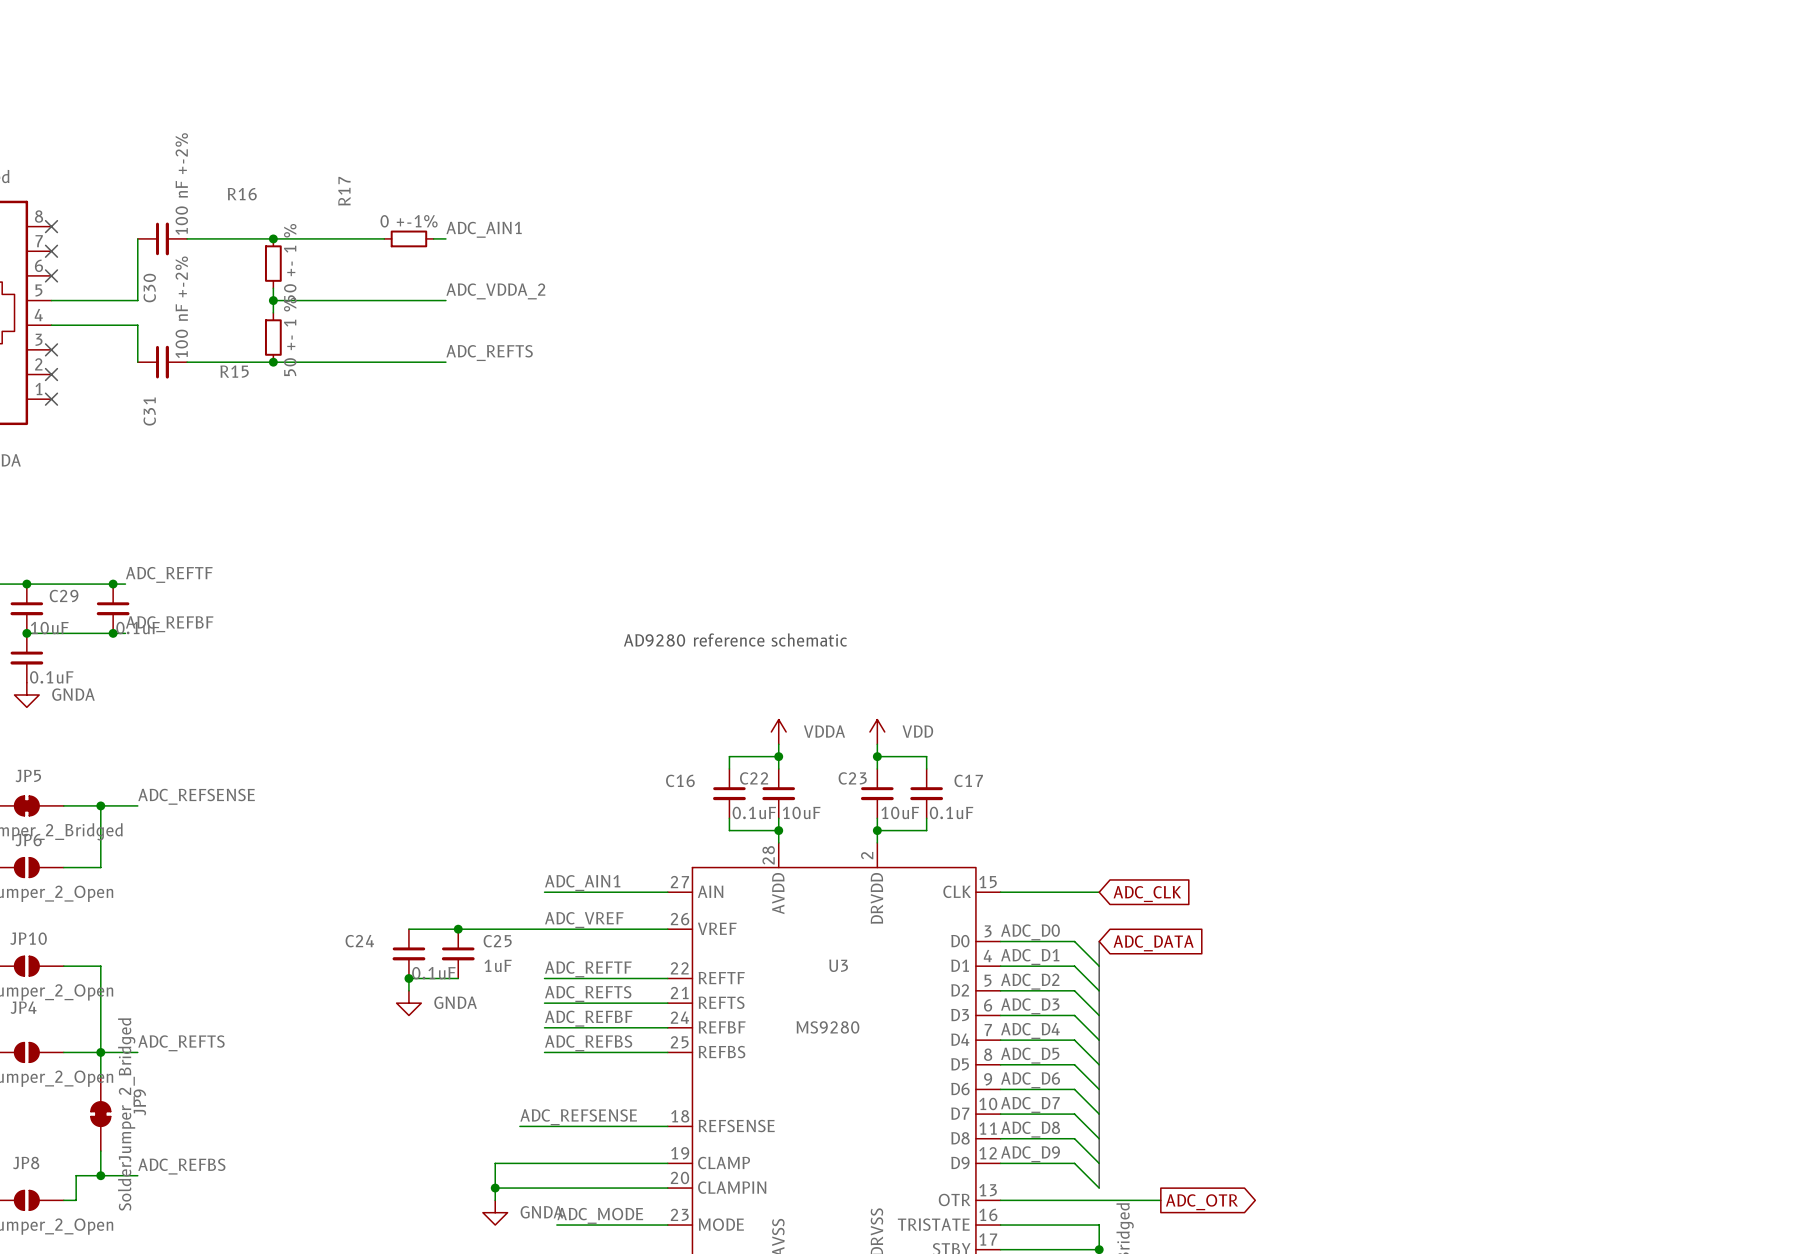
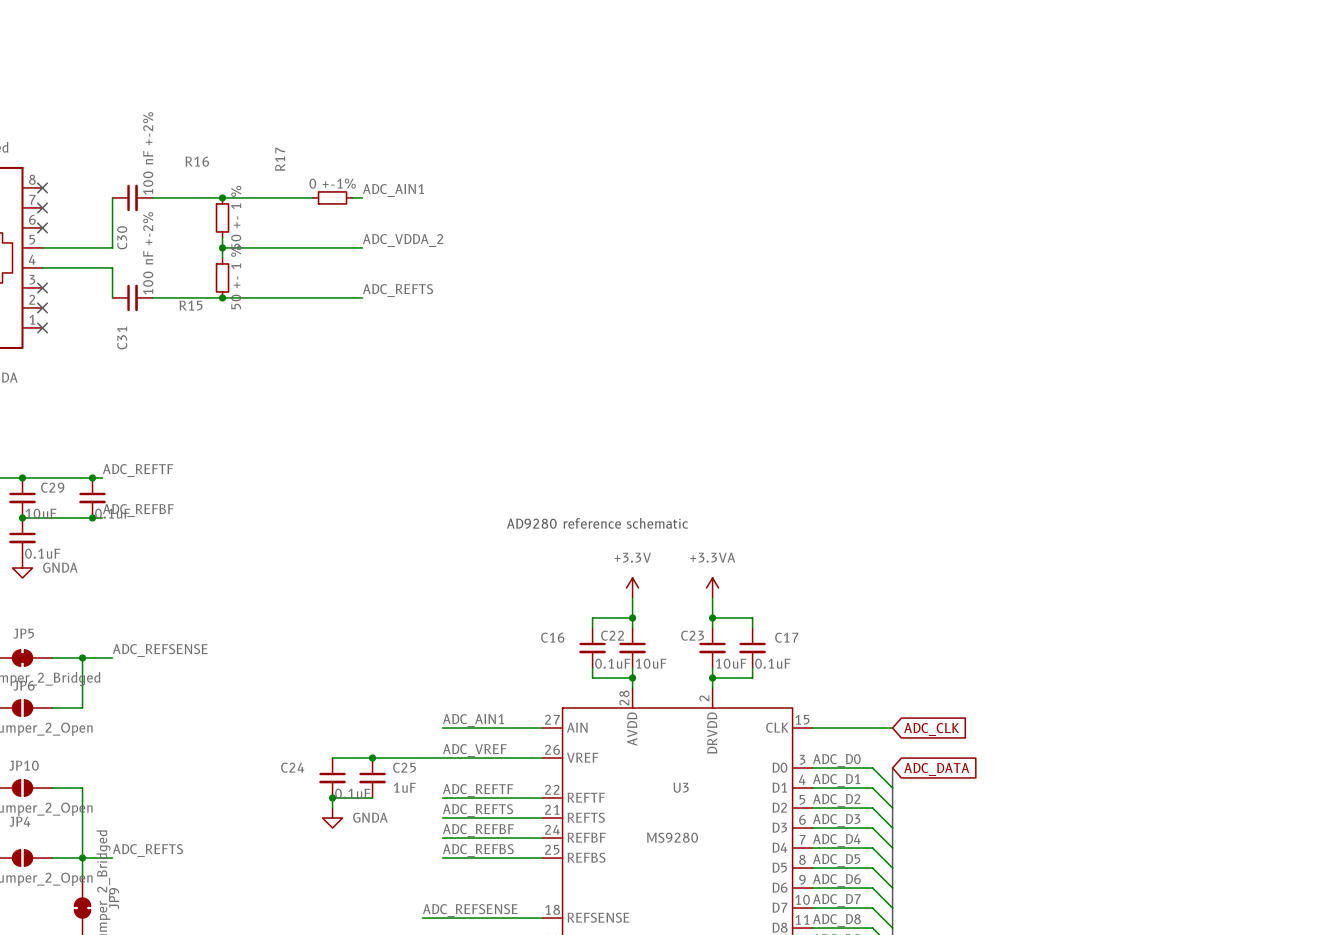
power symbol: none -> +3.3V (632, 587)
power symbol: none -> +3.3VA (712, 587)
power symbol: VDDA (778, 731) -> none
power symbol: VDD (877, 731) -> none

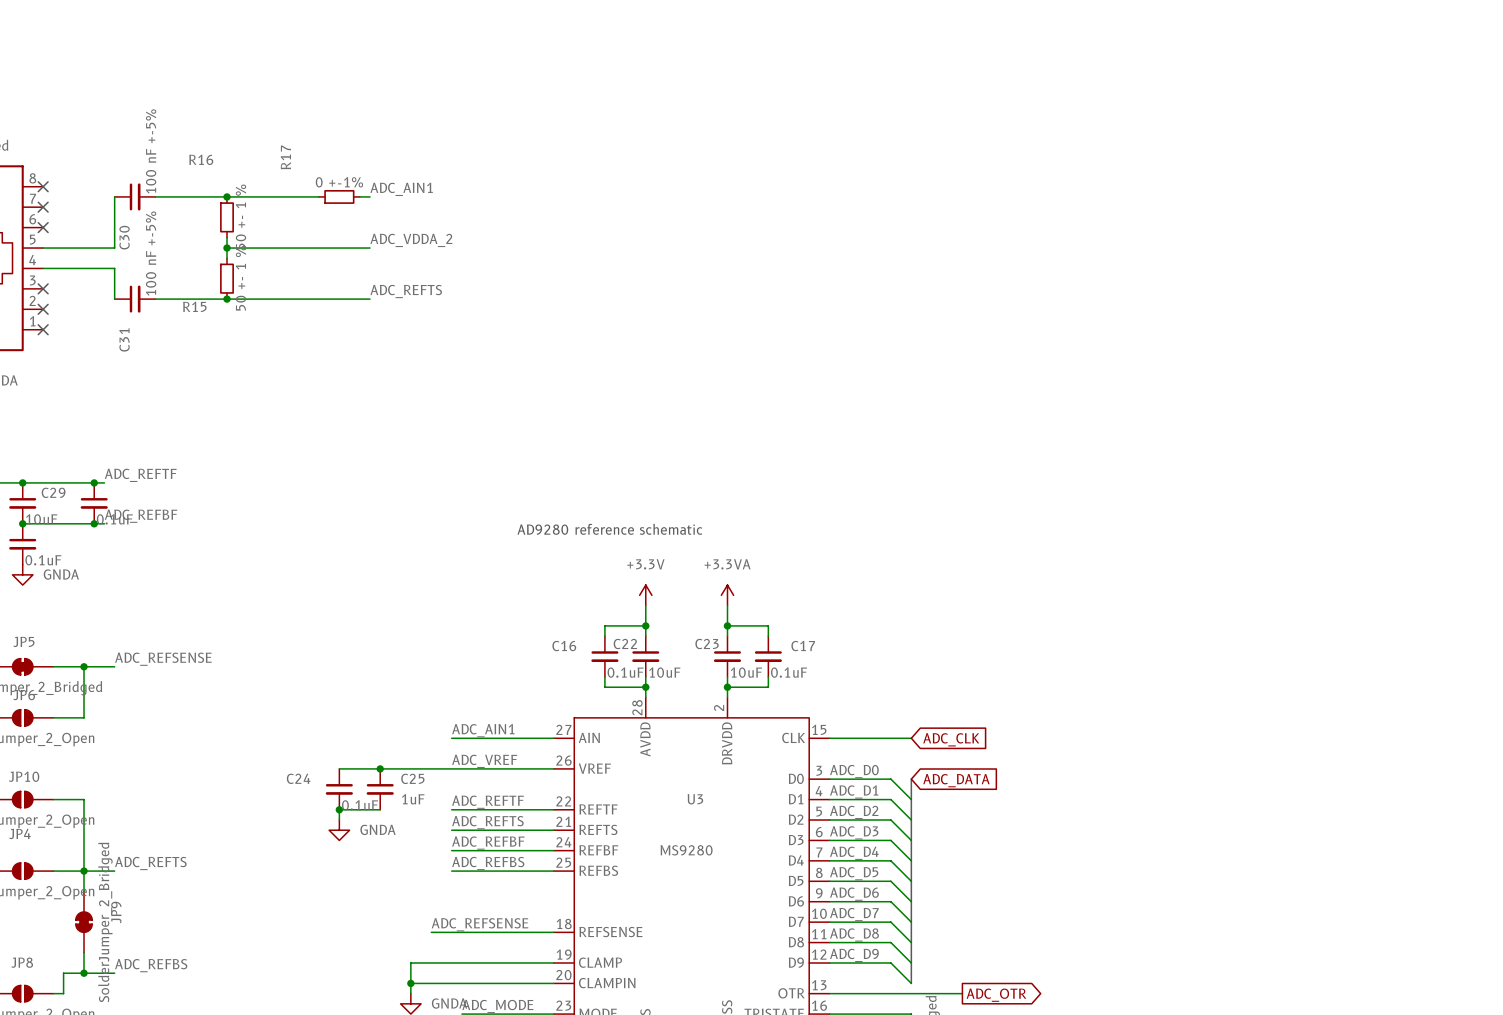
C30 value: 100 nF +-2% (148, 153) -> 100 nF +-5% (151, 151)
C31 value: 100 nF +-2% (148, 253) -> 100 nF +-5% (151, 253)

